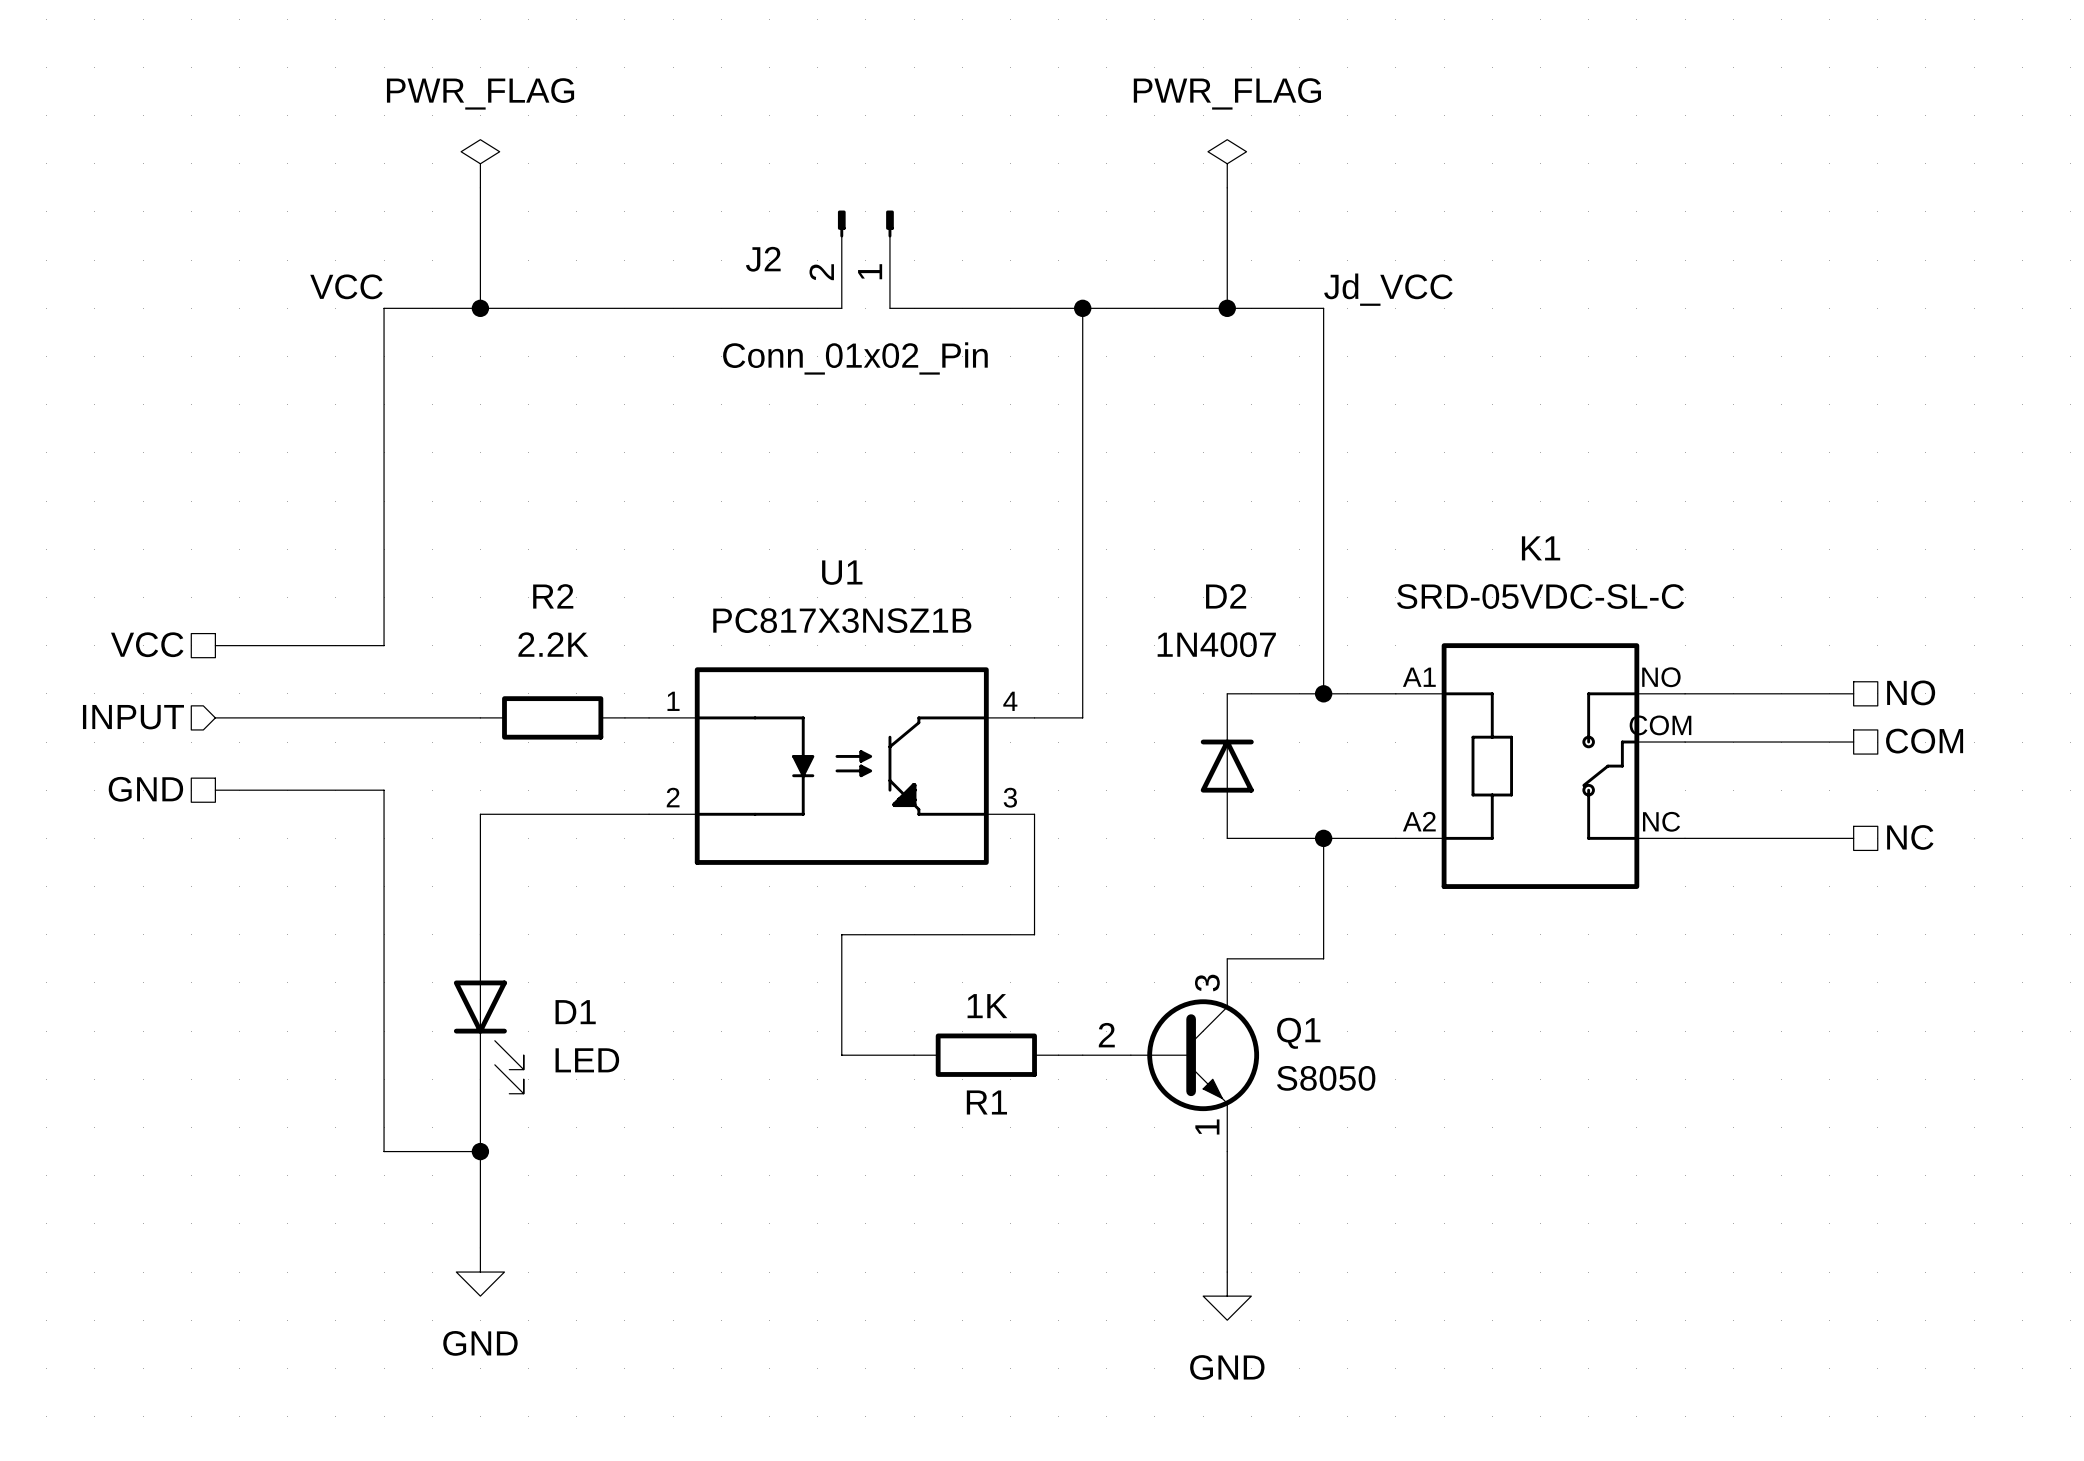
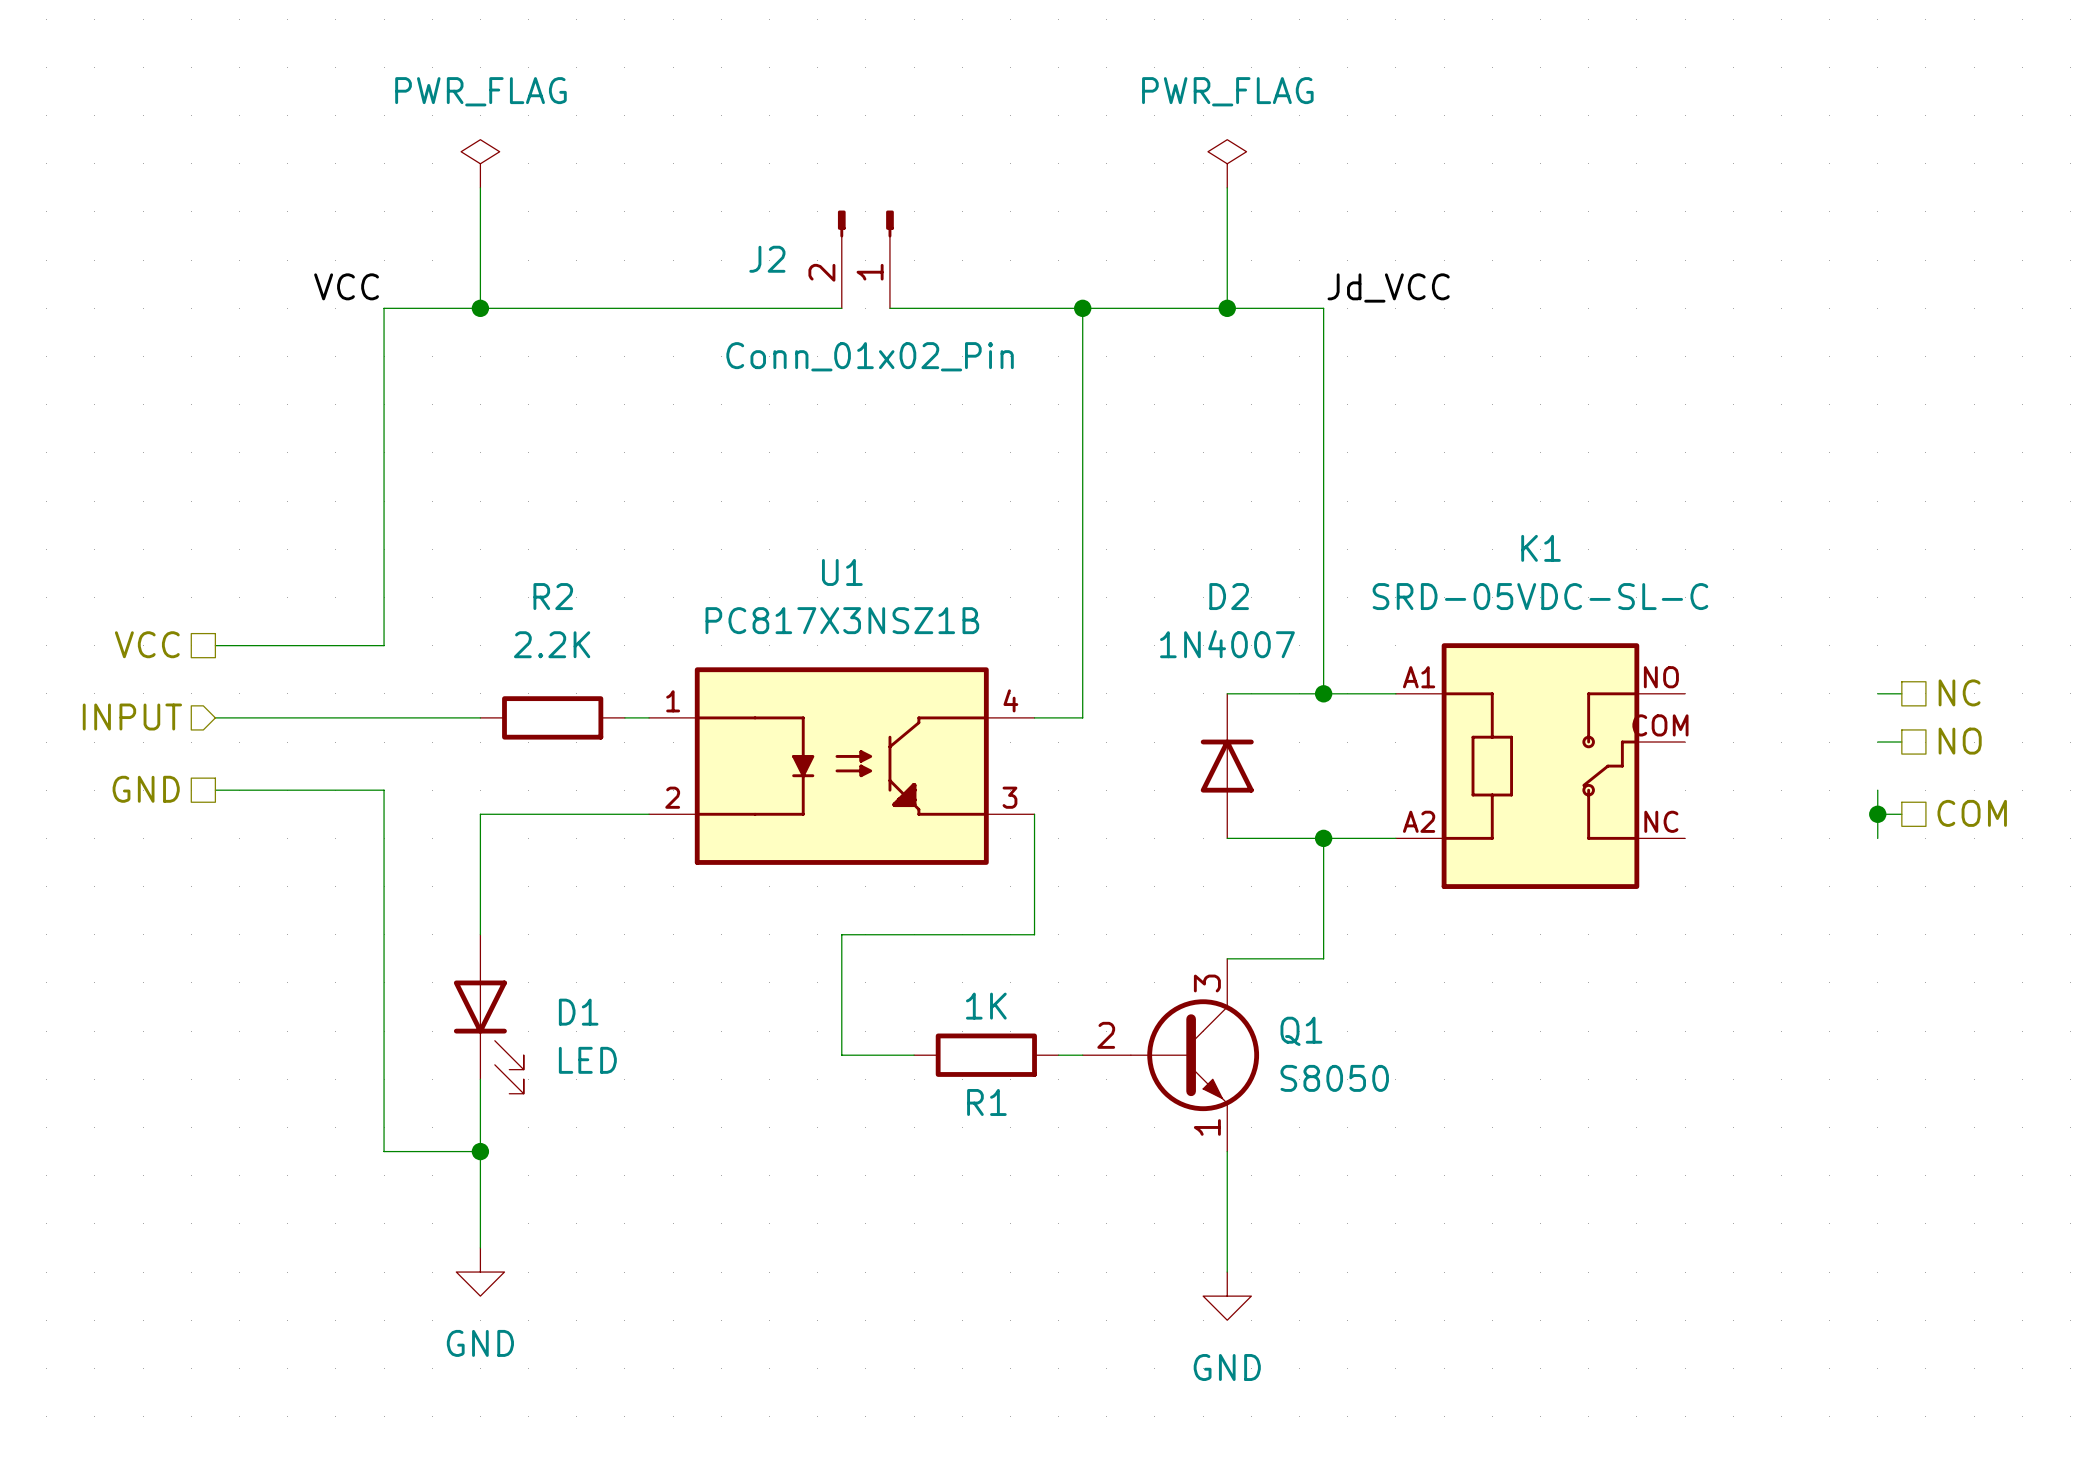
hierarchical label position: NO (1911, 692) -> NO (1960, 741)
wire: (1685, 693) (1853, 693) -> none
wire: none -> (1877, 693) (1901, 693)
hierarchical label position: COM (1924, 741) -> COM (1972, 813)
wire: (1685, 742) (1853, 742) -> none
wire: none -> (1877, 742) (1901, 742)
wire: none -> (1877, 790) (1877, 838)
wire: none -> (1877, 814) (1901, 814)
junction: none -> (1877, 814)
hierarchical label position: NC (1910, 837) -> NC (1959, 692)
wire: (1685, 838) (1853, 838) -> none

